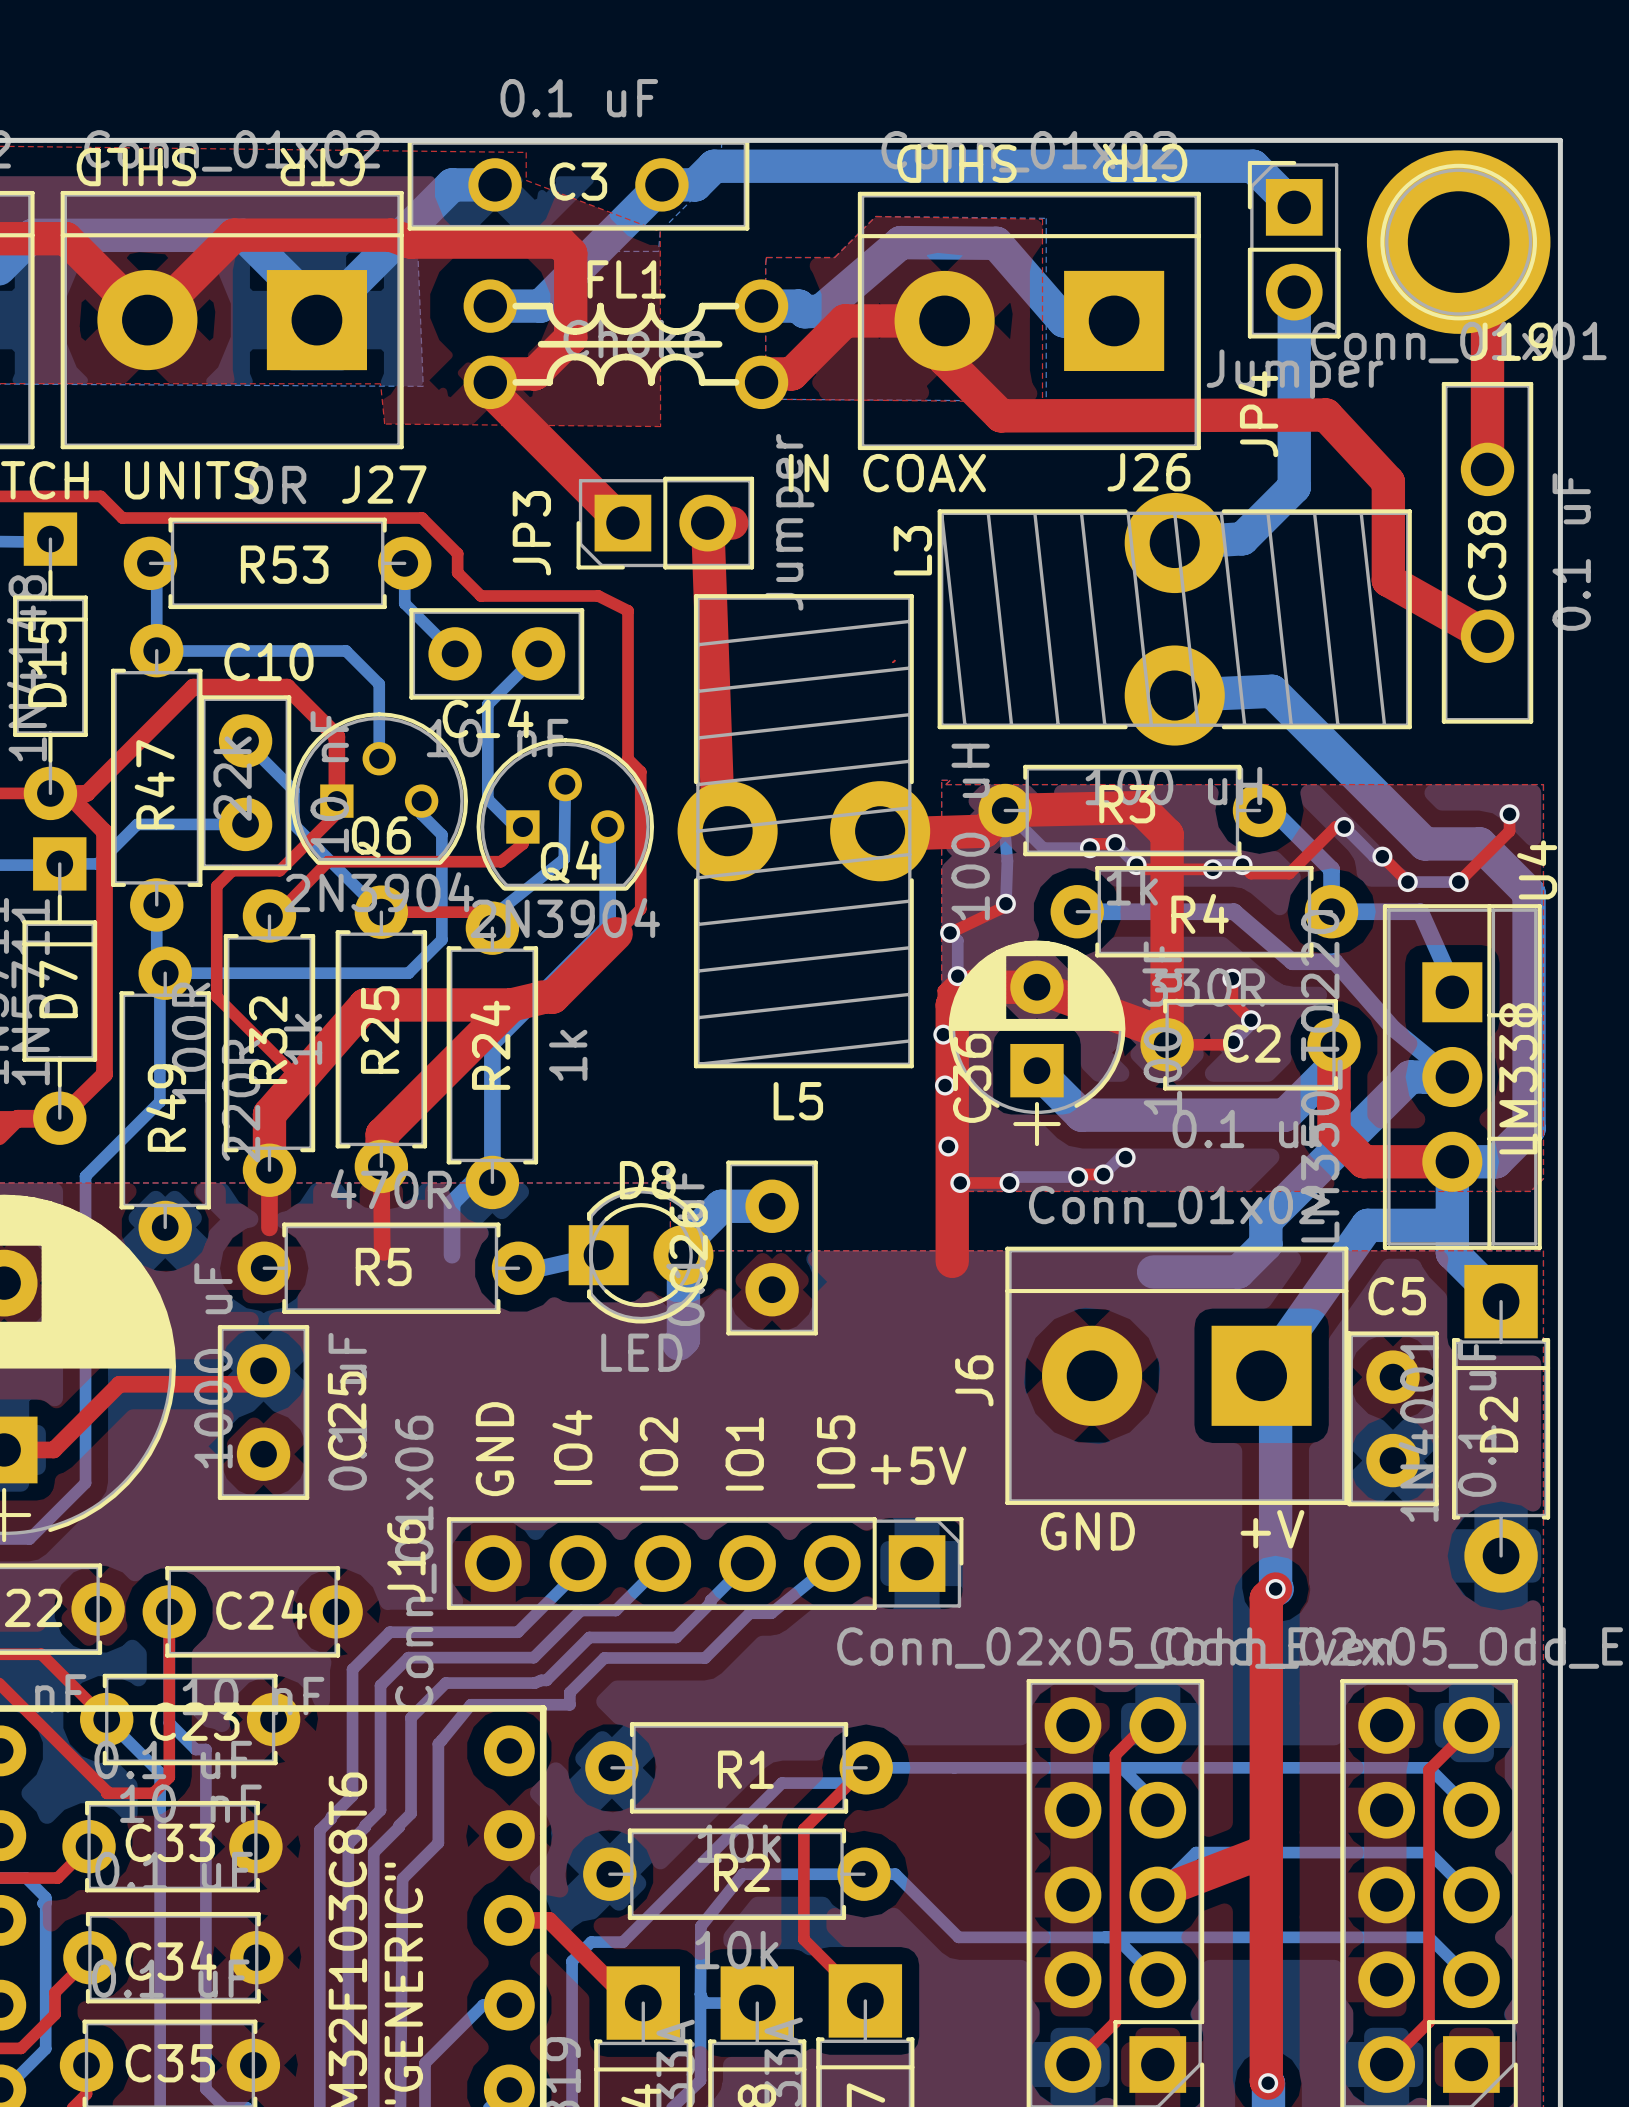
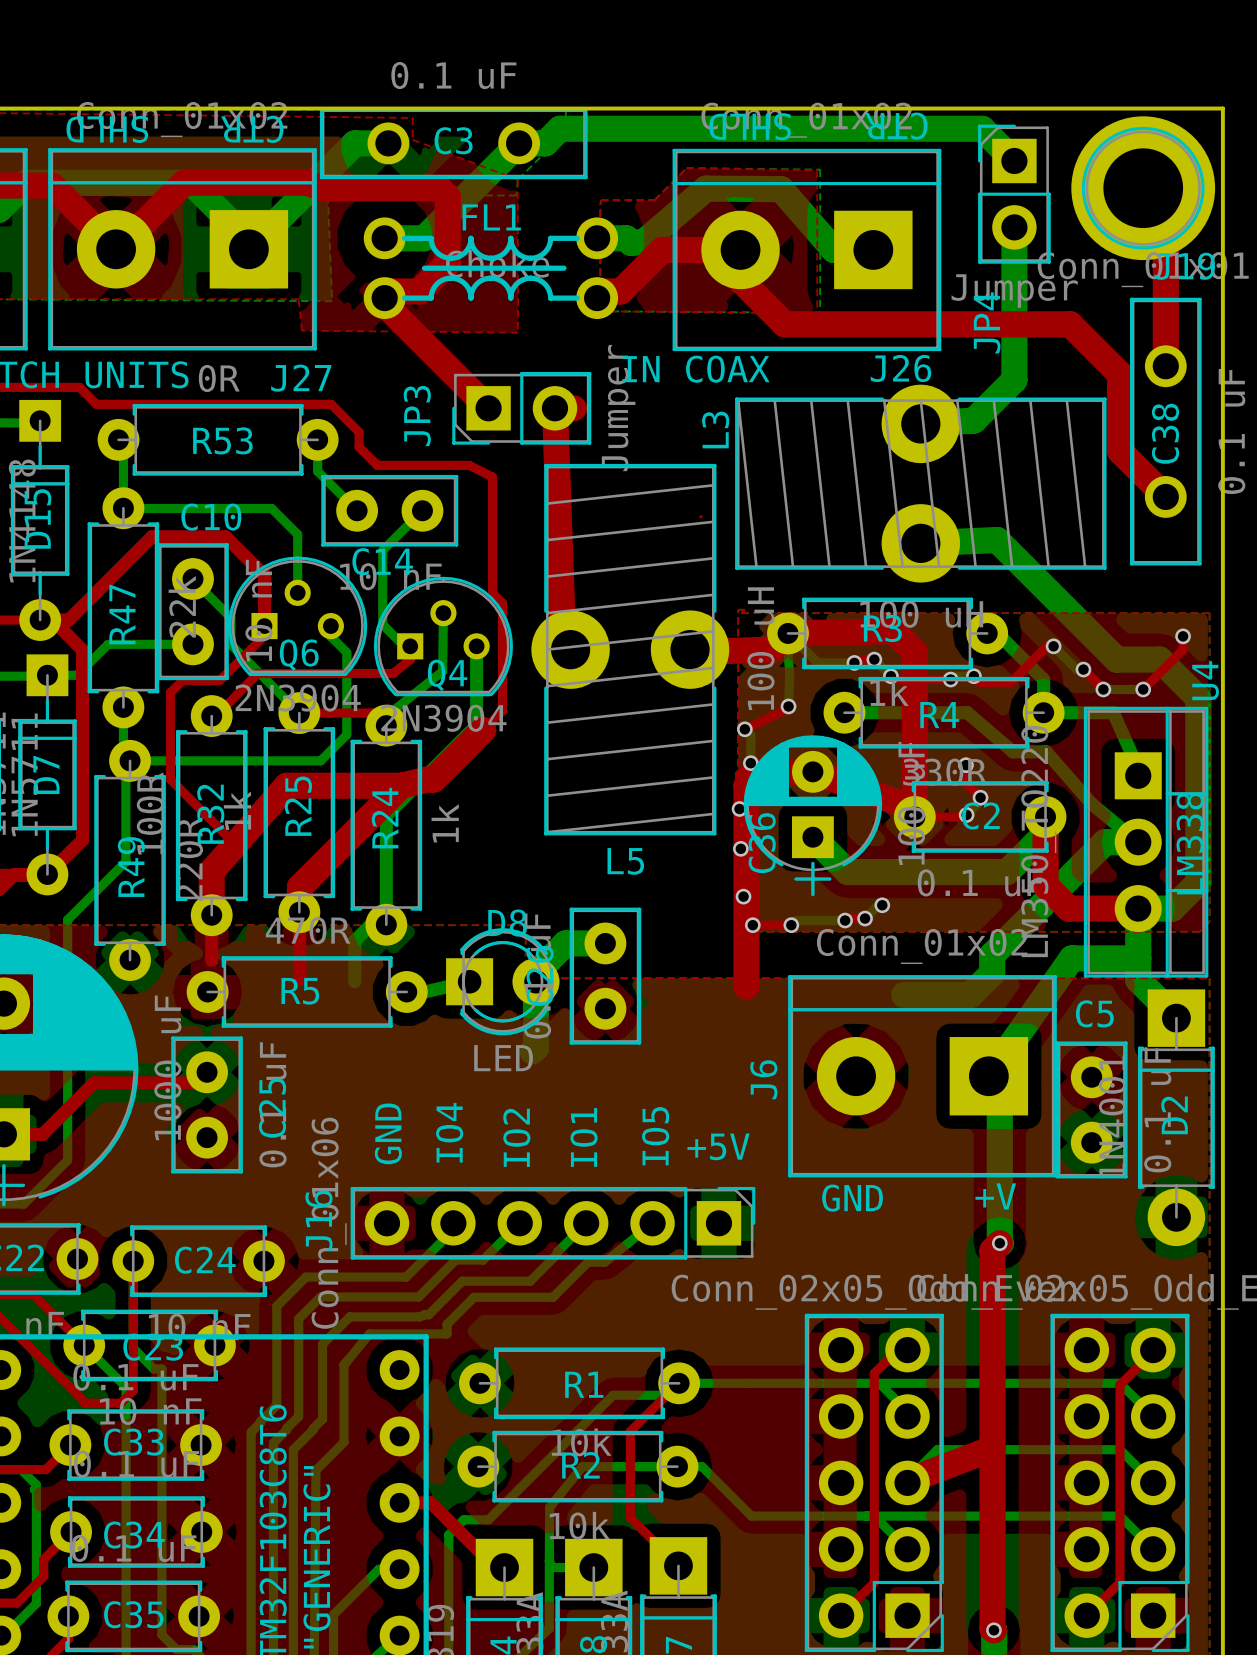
top track: (1000, 415) (1326, 415) (1388, 481) (1388, 580) (1487, 636) -> (784, 324) (1070, 324) (1119, 374) (1119, 451) (1165, 496)

